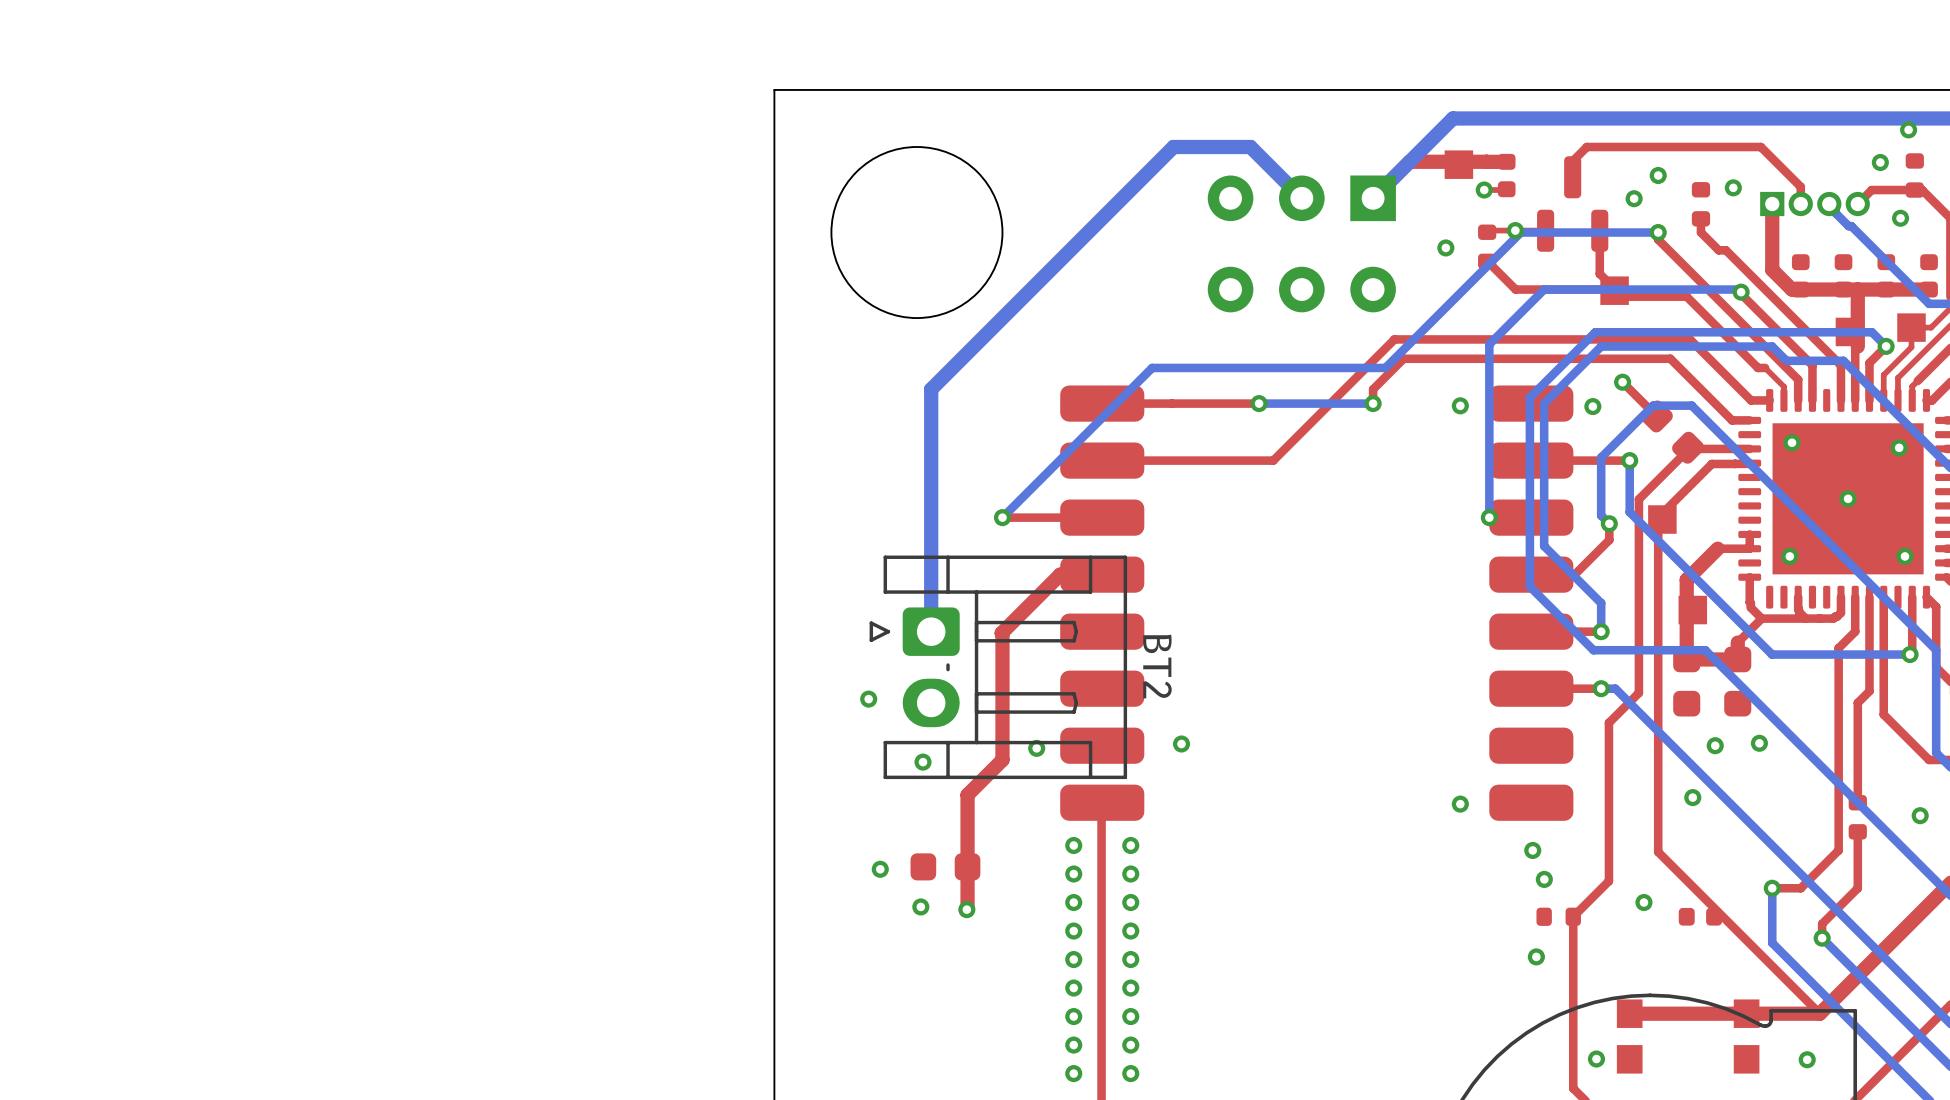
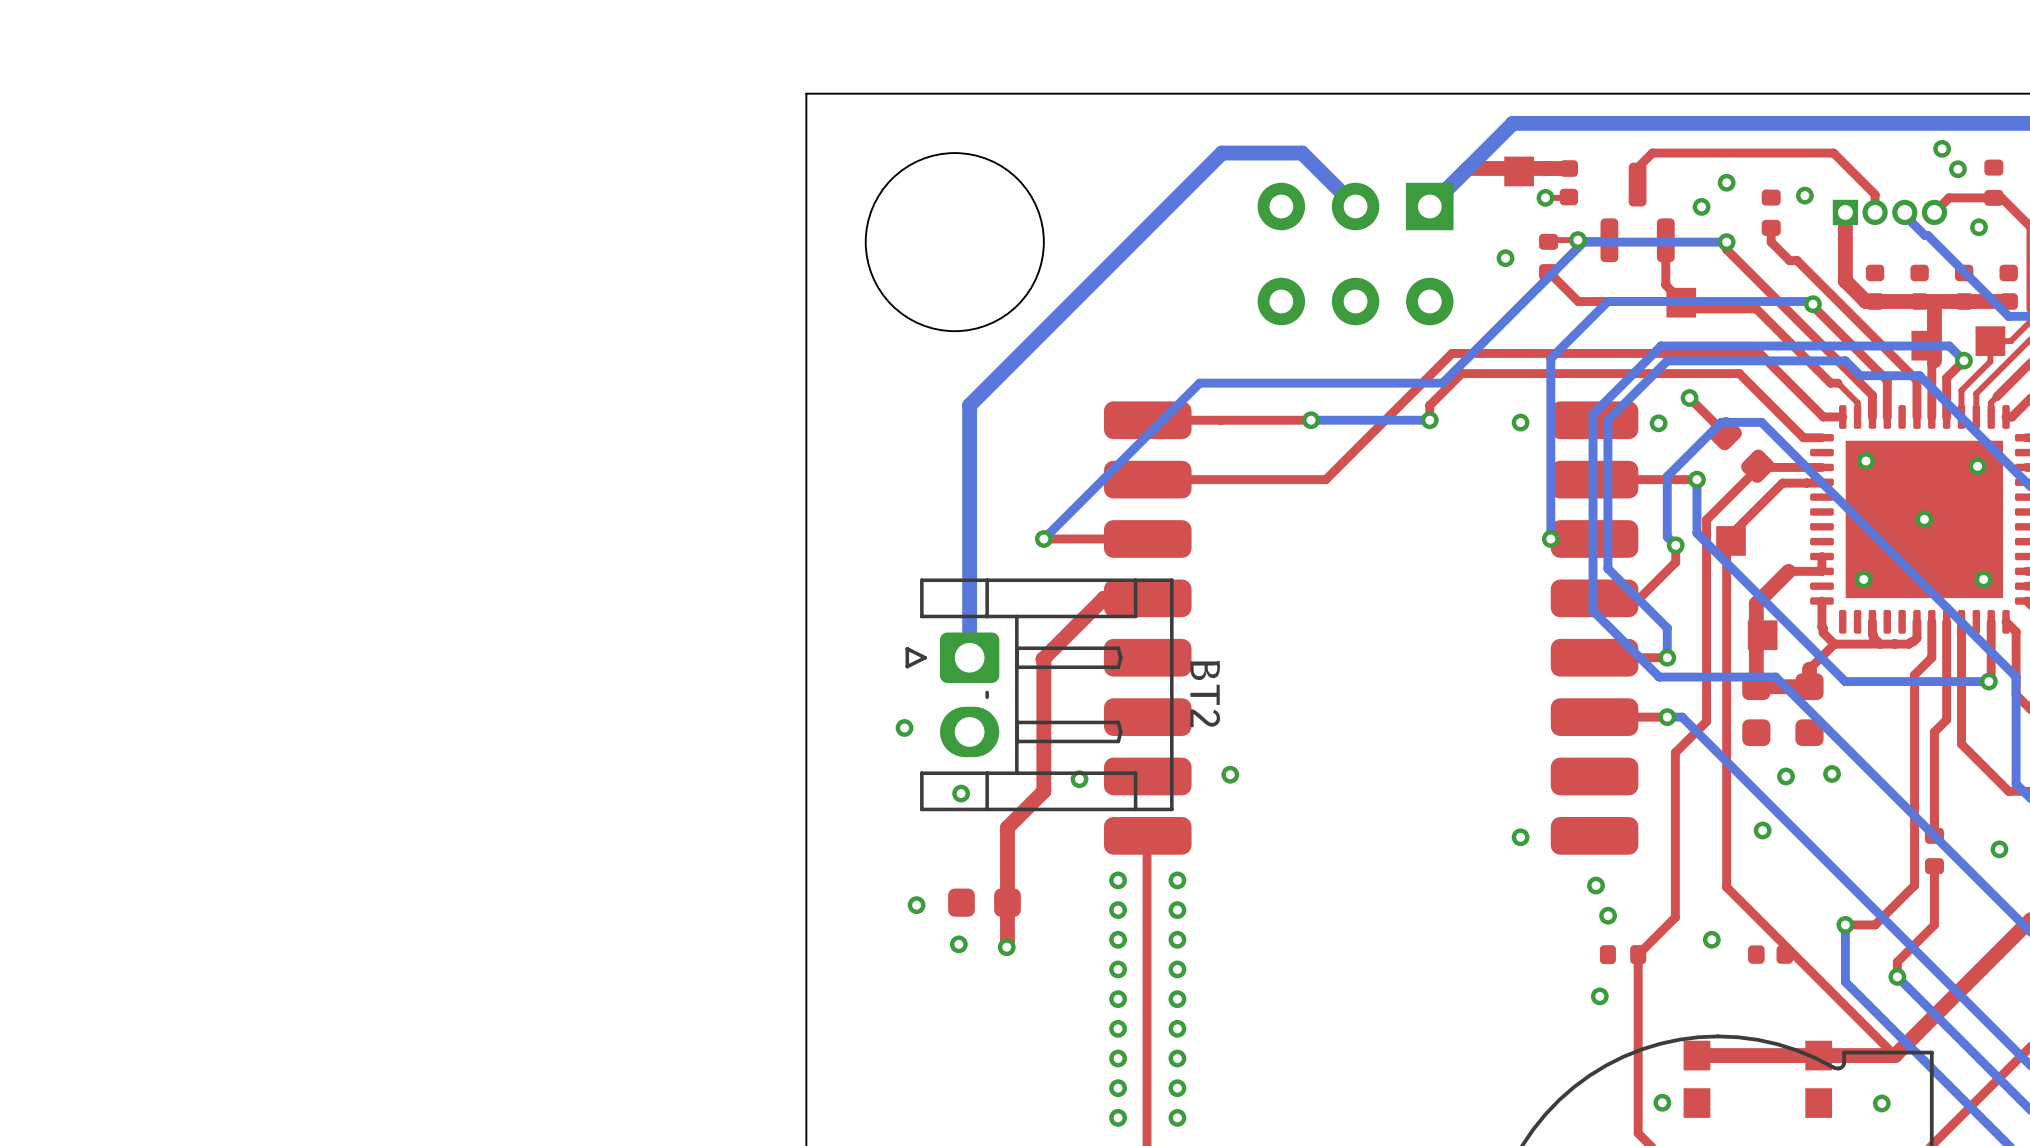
via: (1908, 129) -> none
via: none -> (1942, 148)

